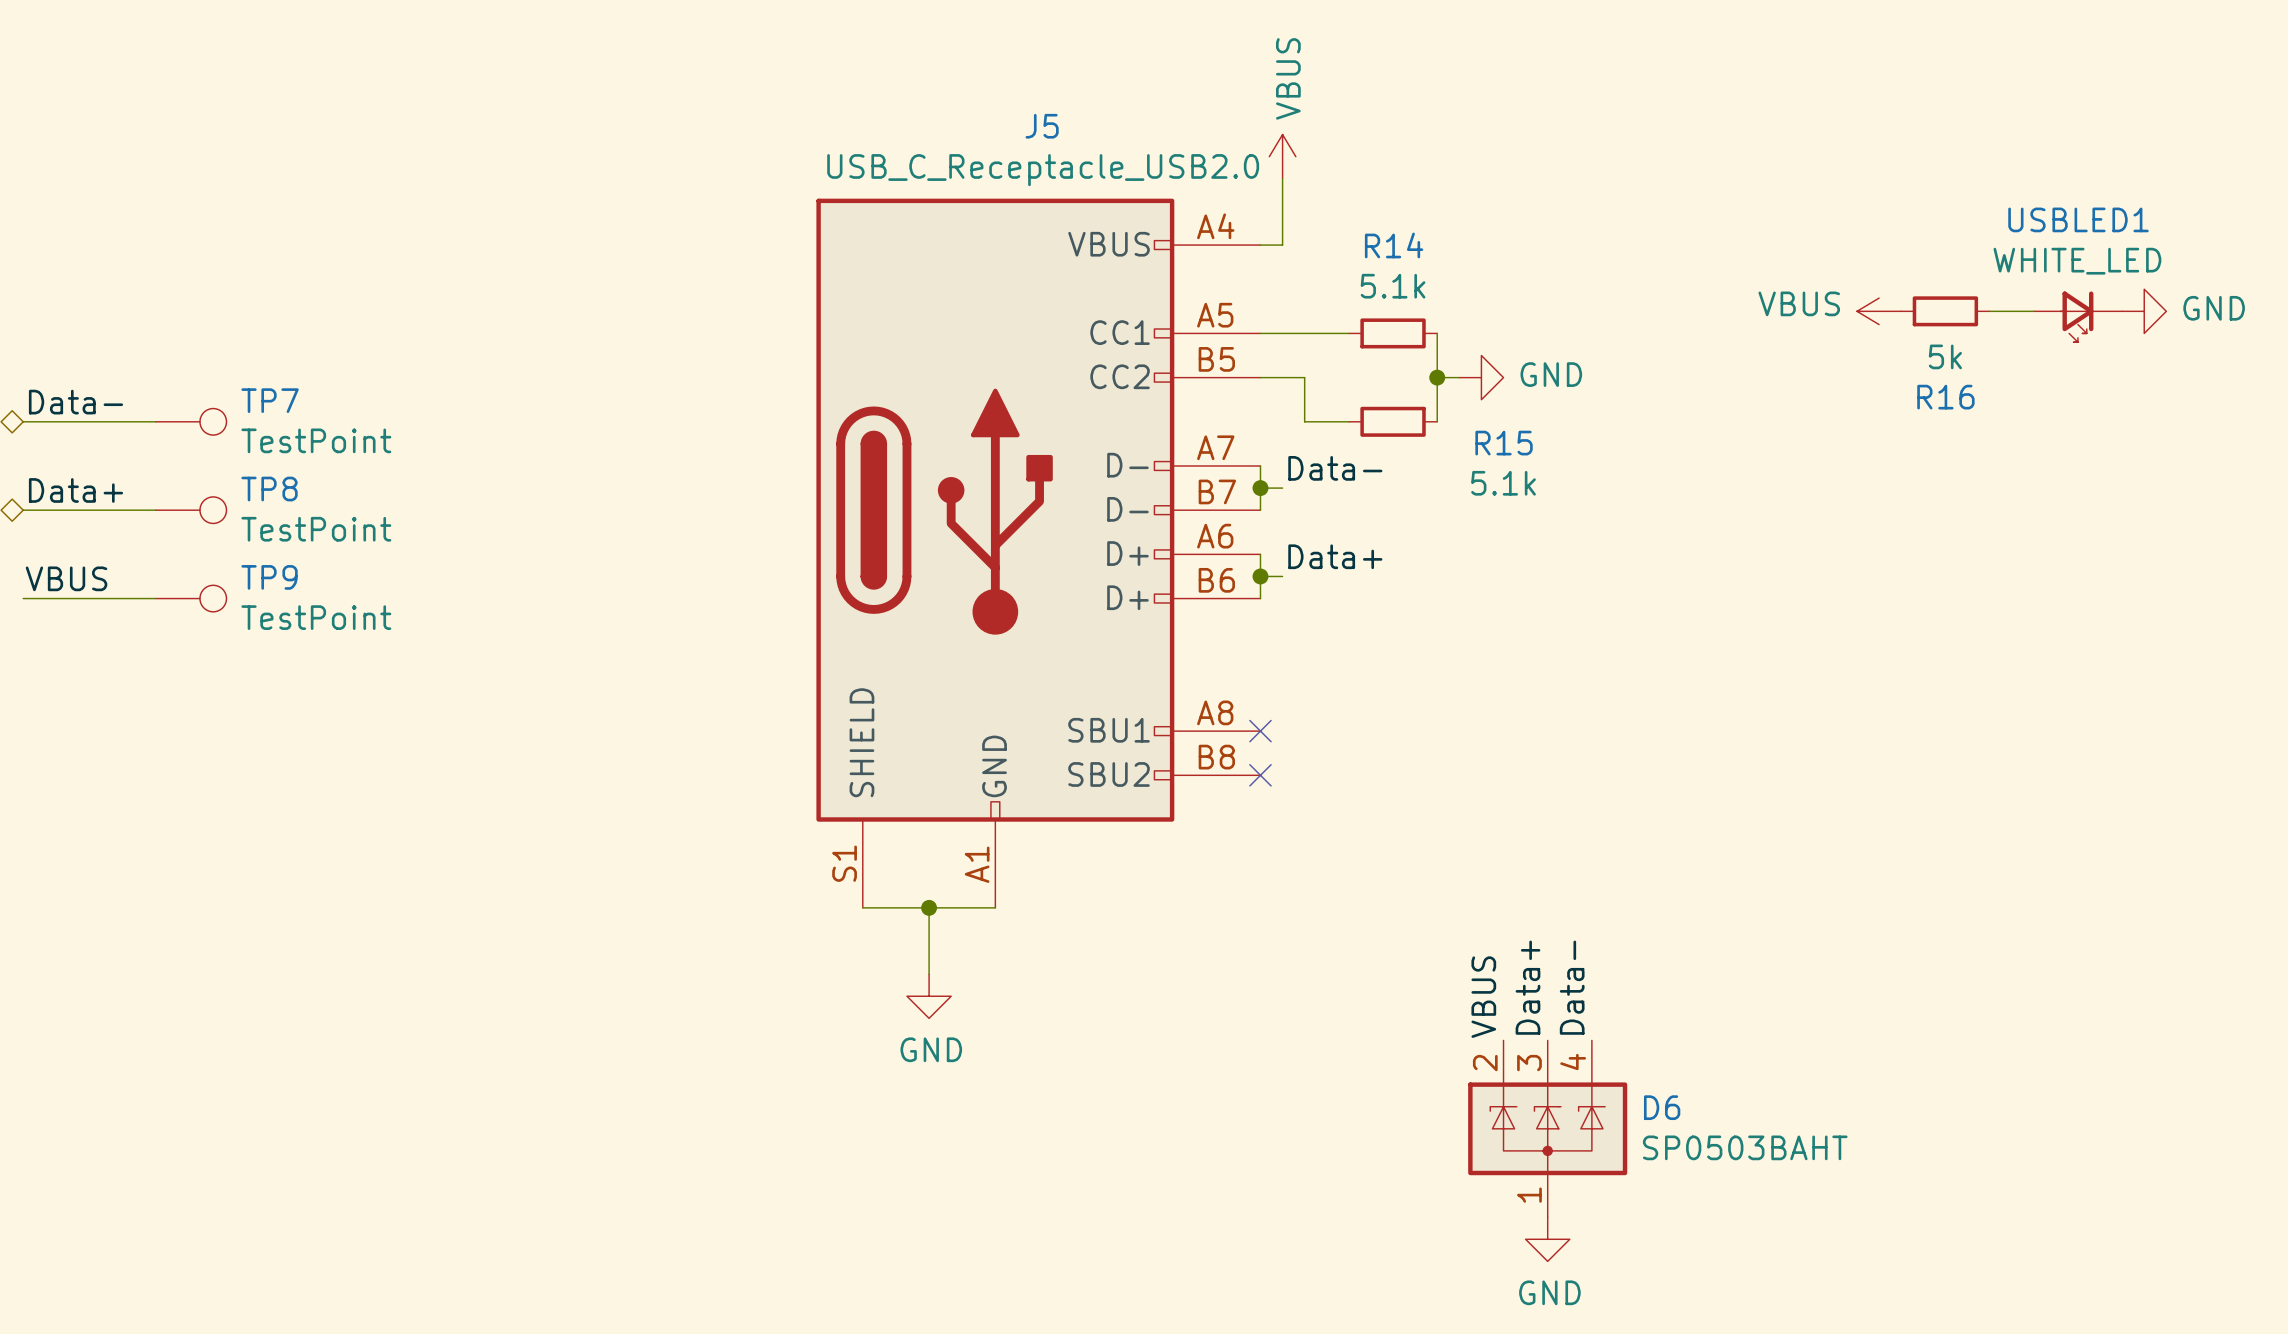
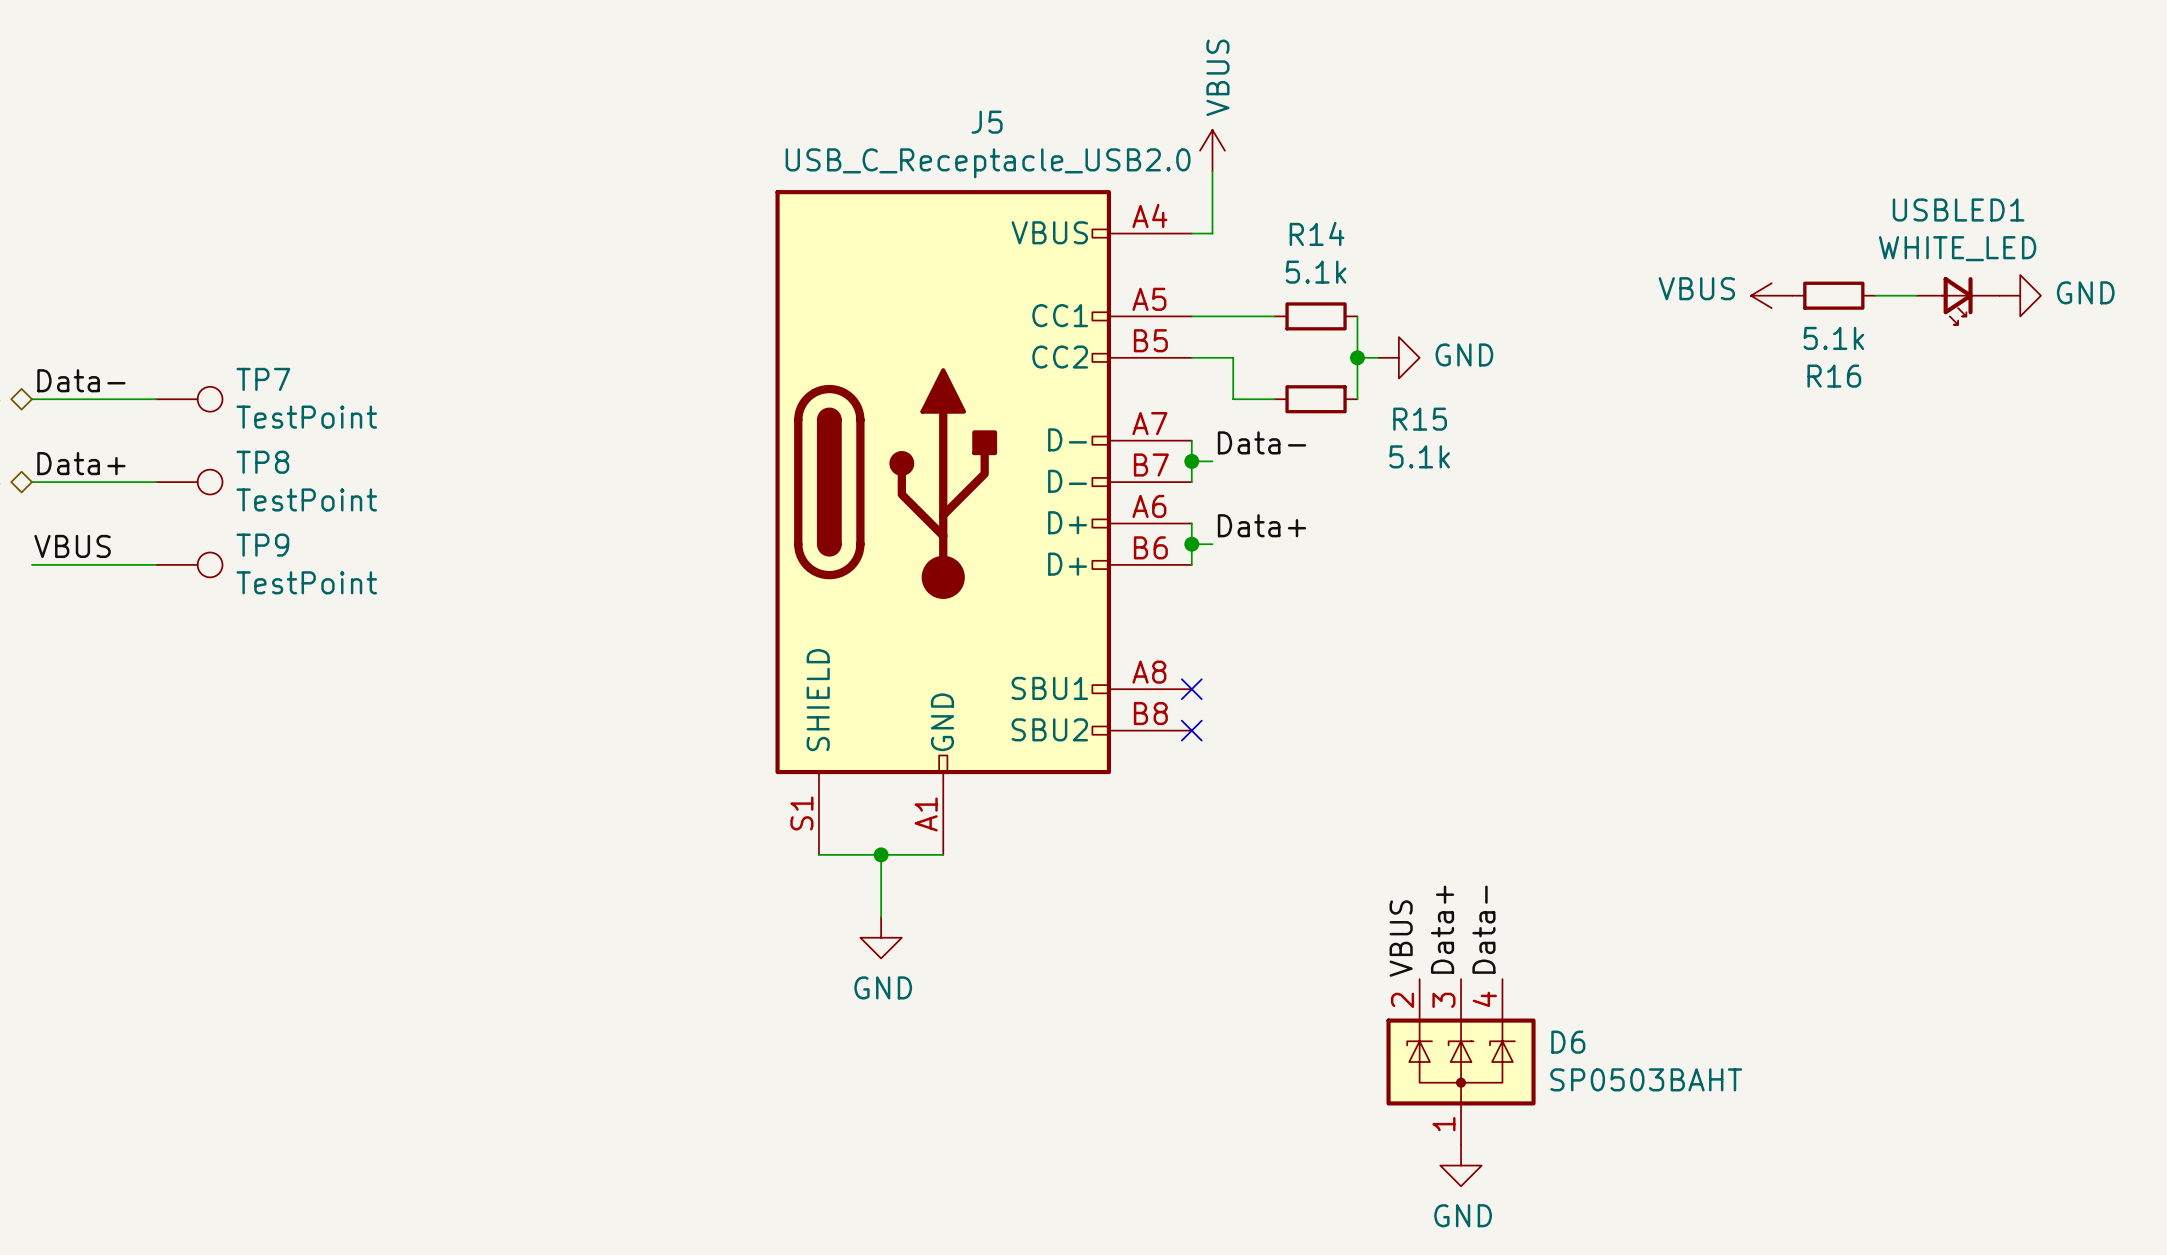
R16 value: 5k (1945, 356) -> 5.1k (1833, 338)

